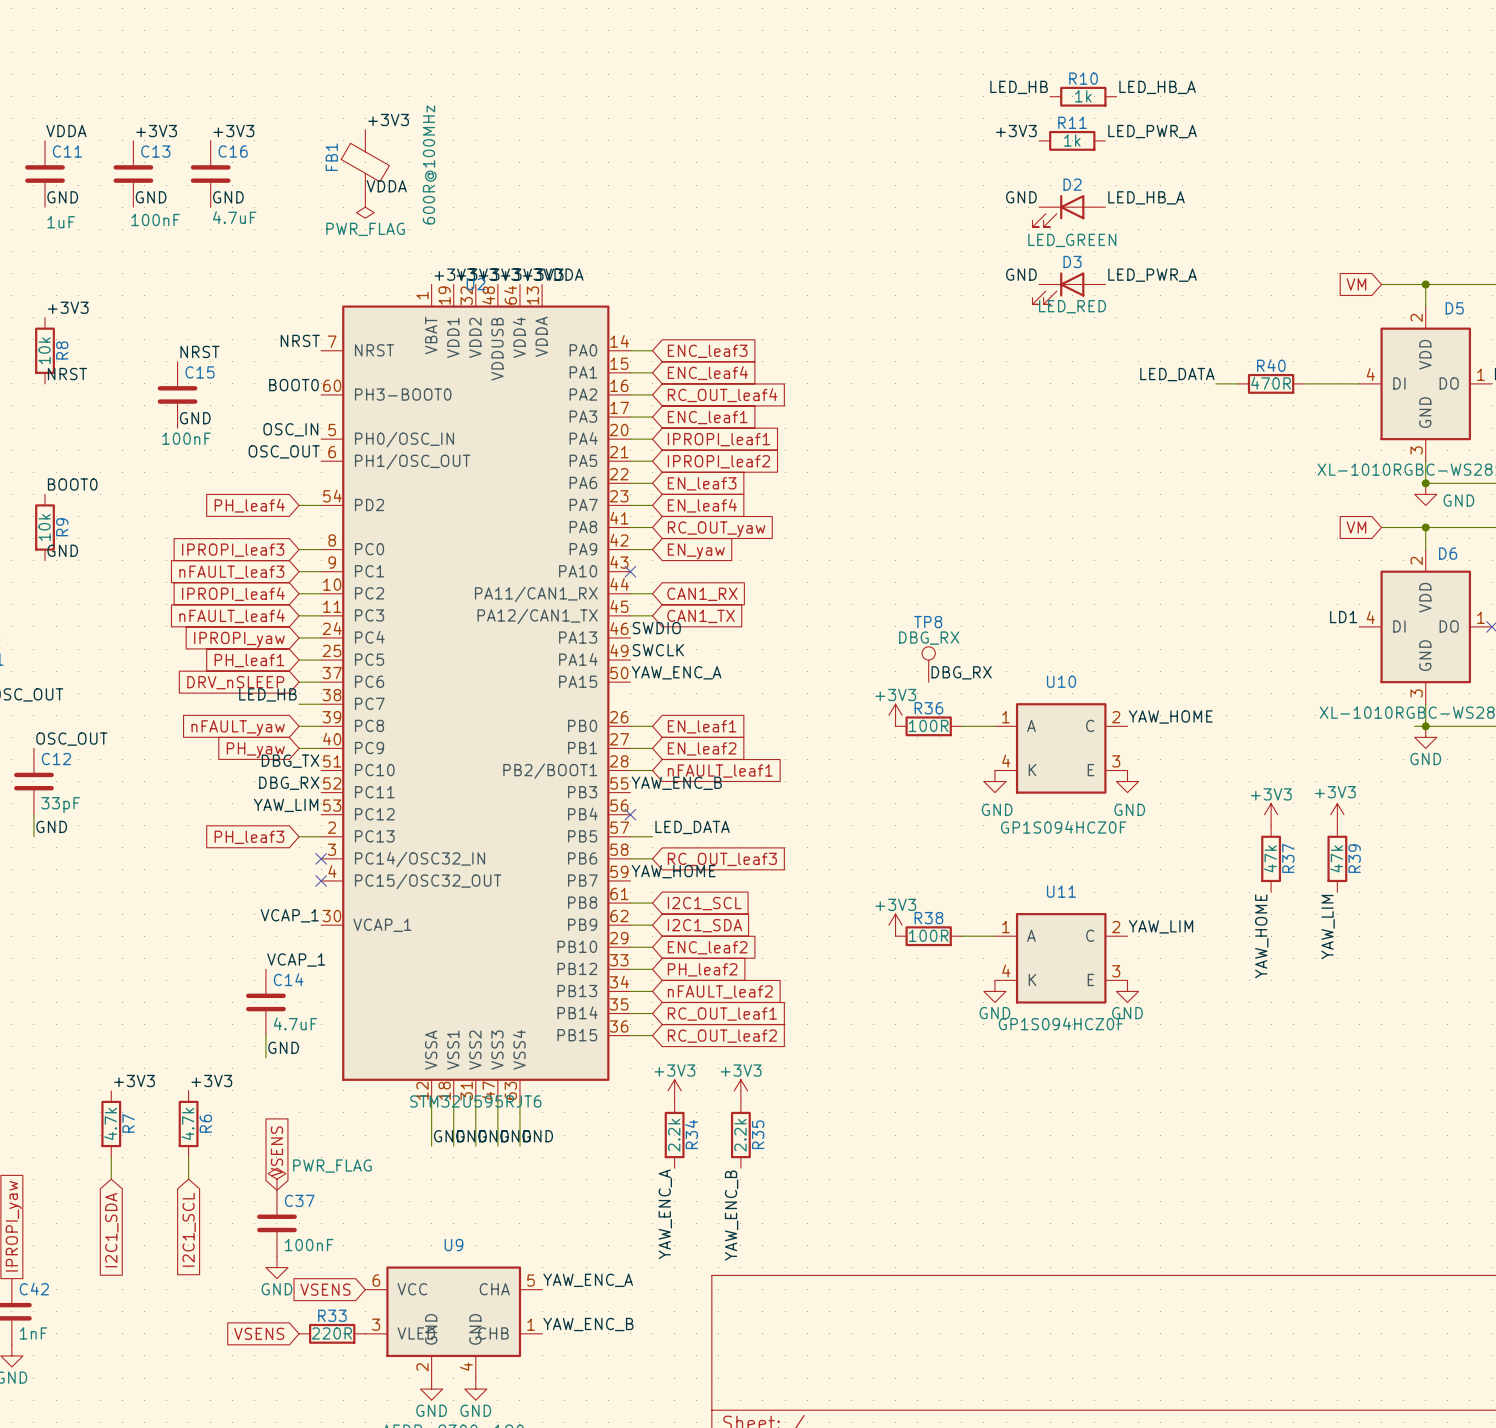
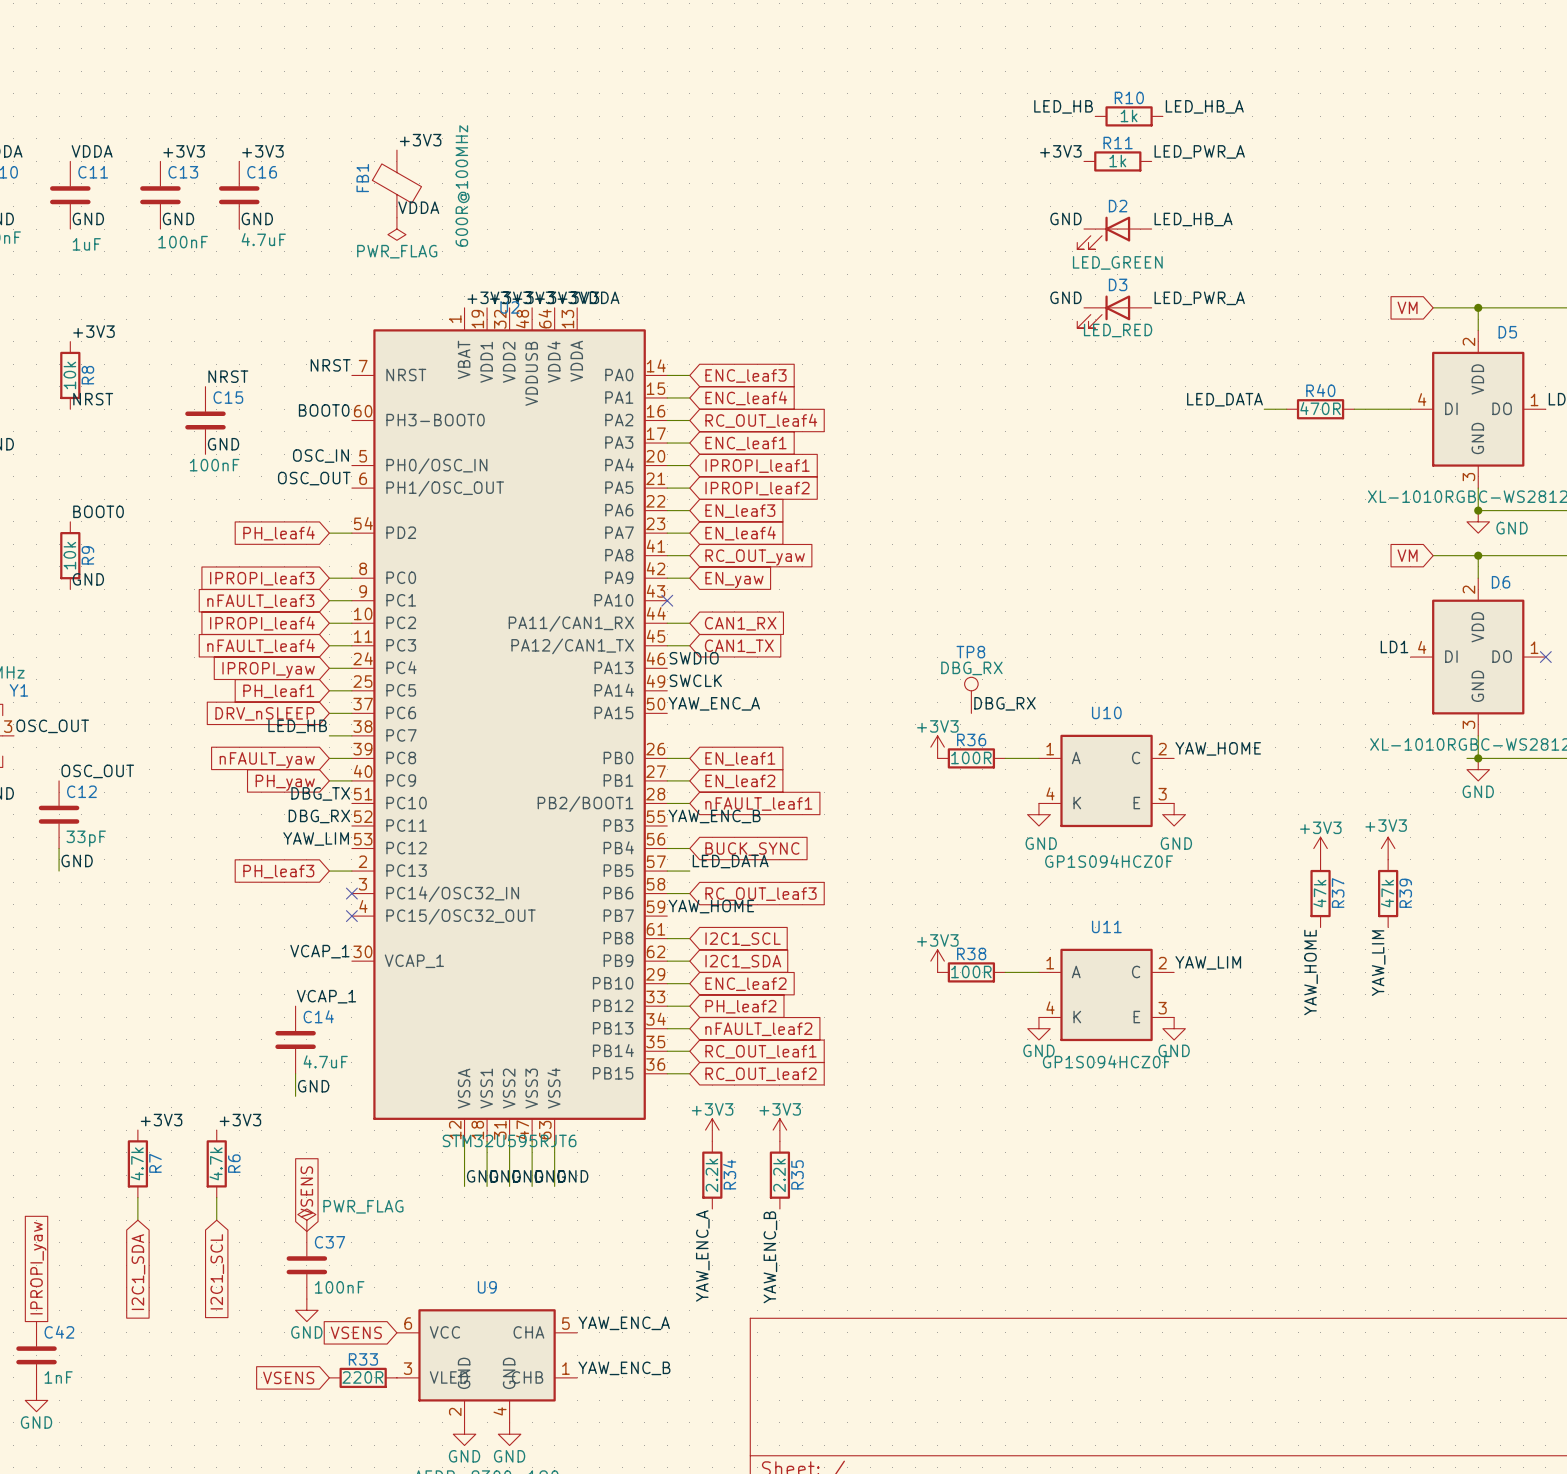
wire: none -> (667, 848) (689, 848)
no-connect mark: (630, 814) -> none
global label: none -> BUCK_SYNC (752, 849)

